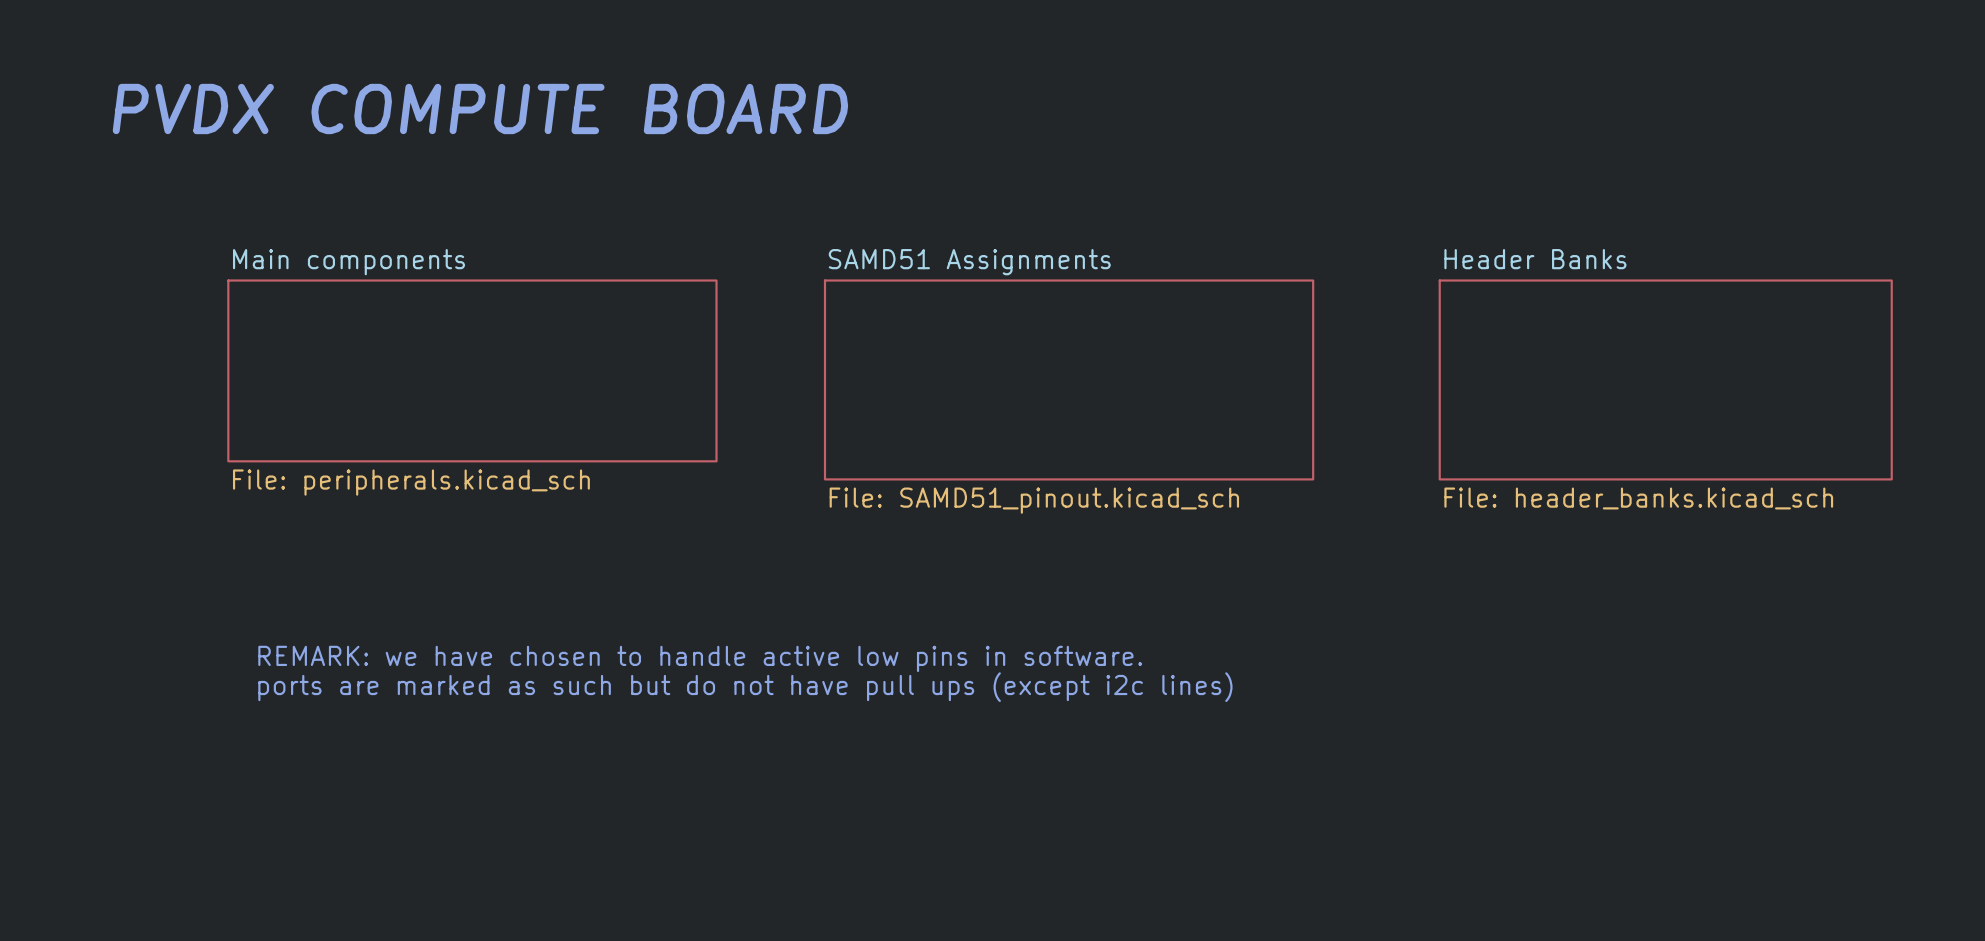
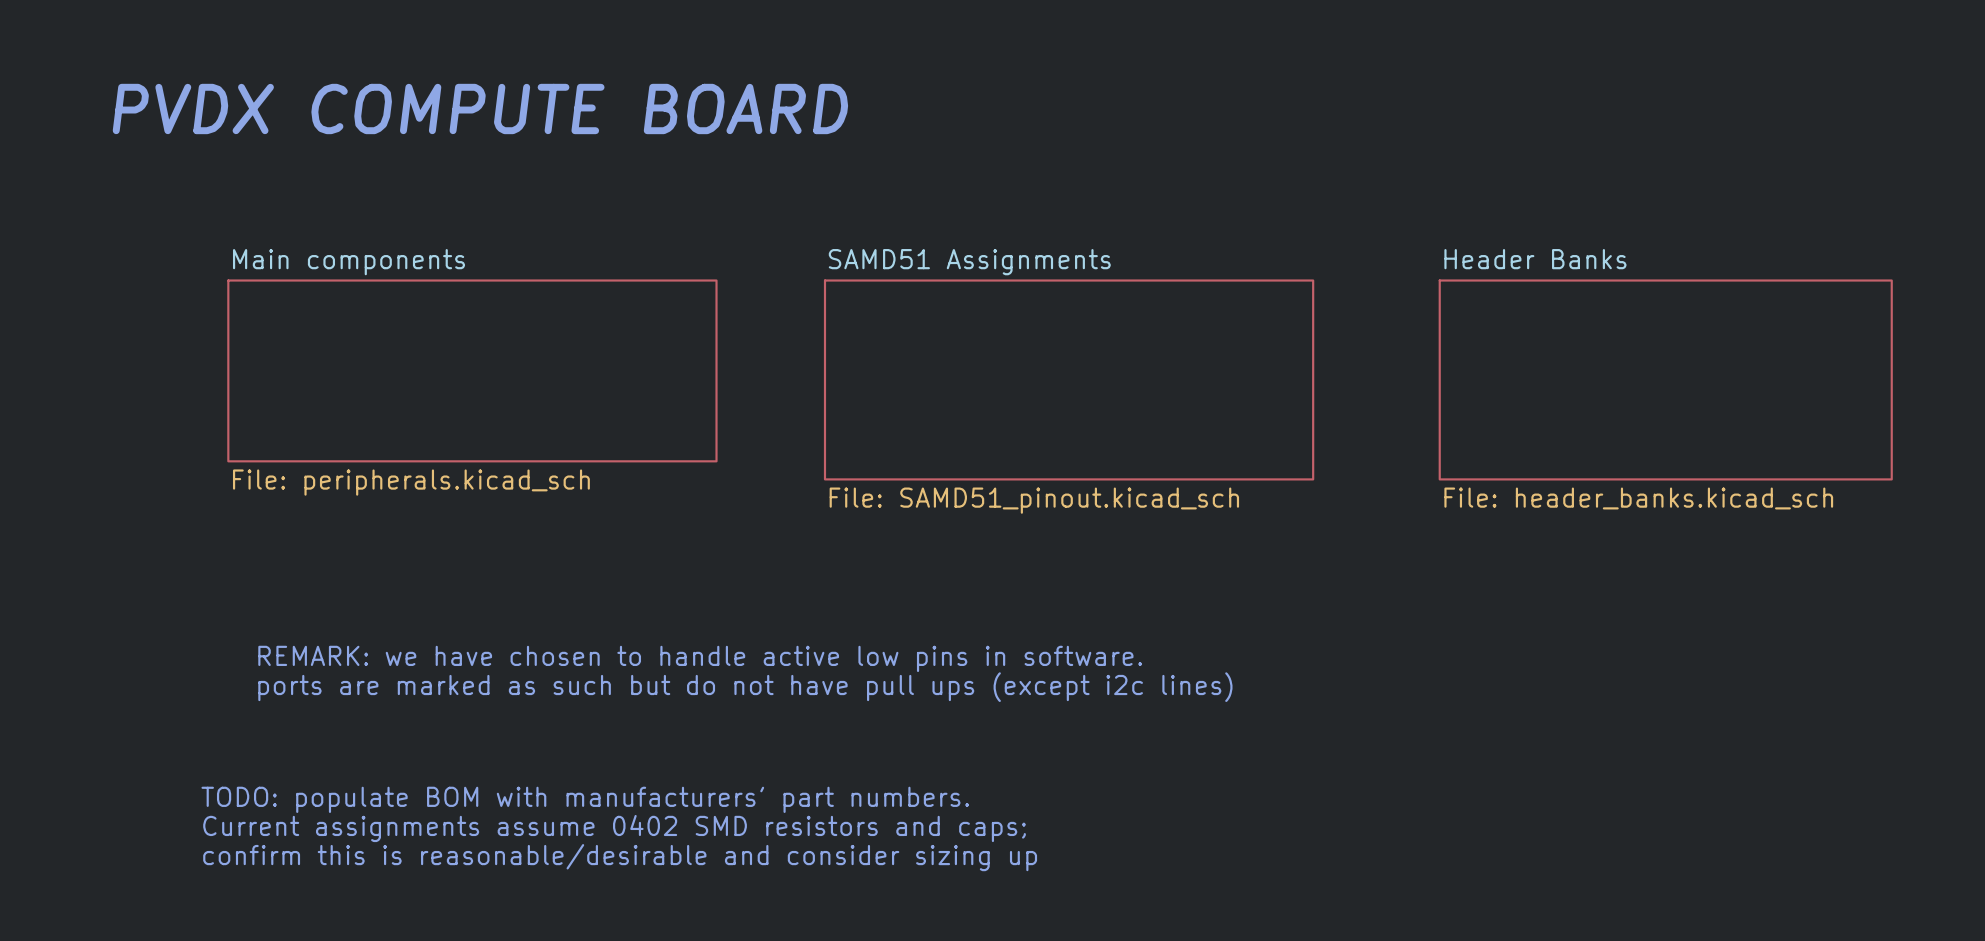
text: none -> TODO: populate BOM with manufacturers' part numbers. (585, 799)
text: none -> Current assignments assume 0402 SMD resistors and caps; (614, 828)
text: none -> confirm this is reasonable/desirable and consider sizing up (620, 857)

